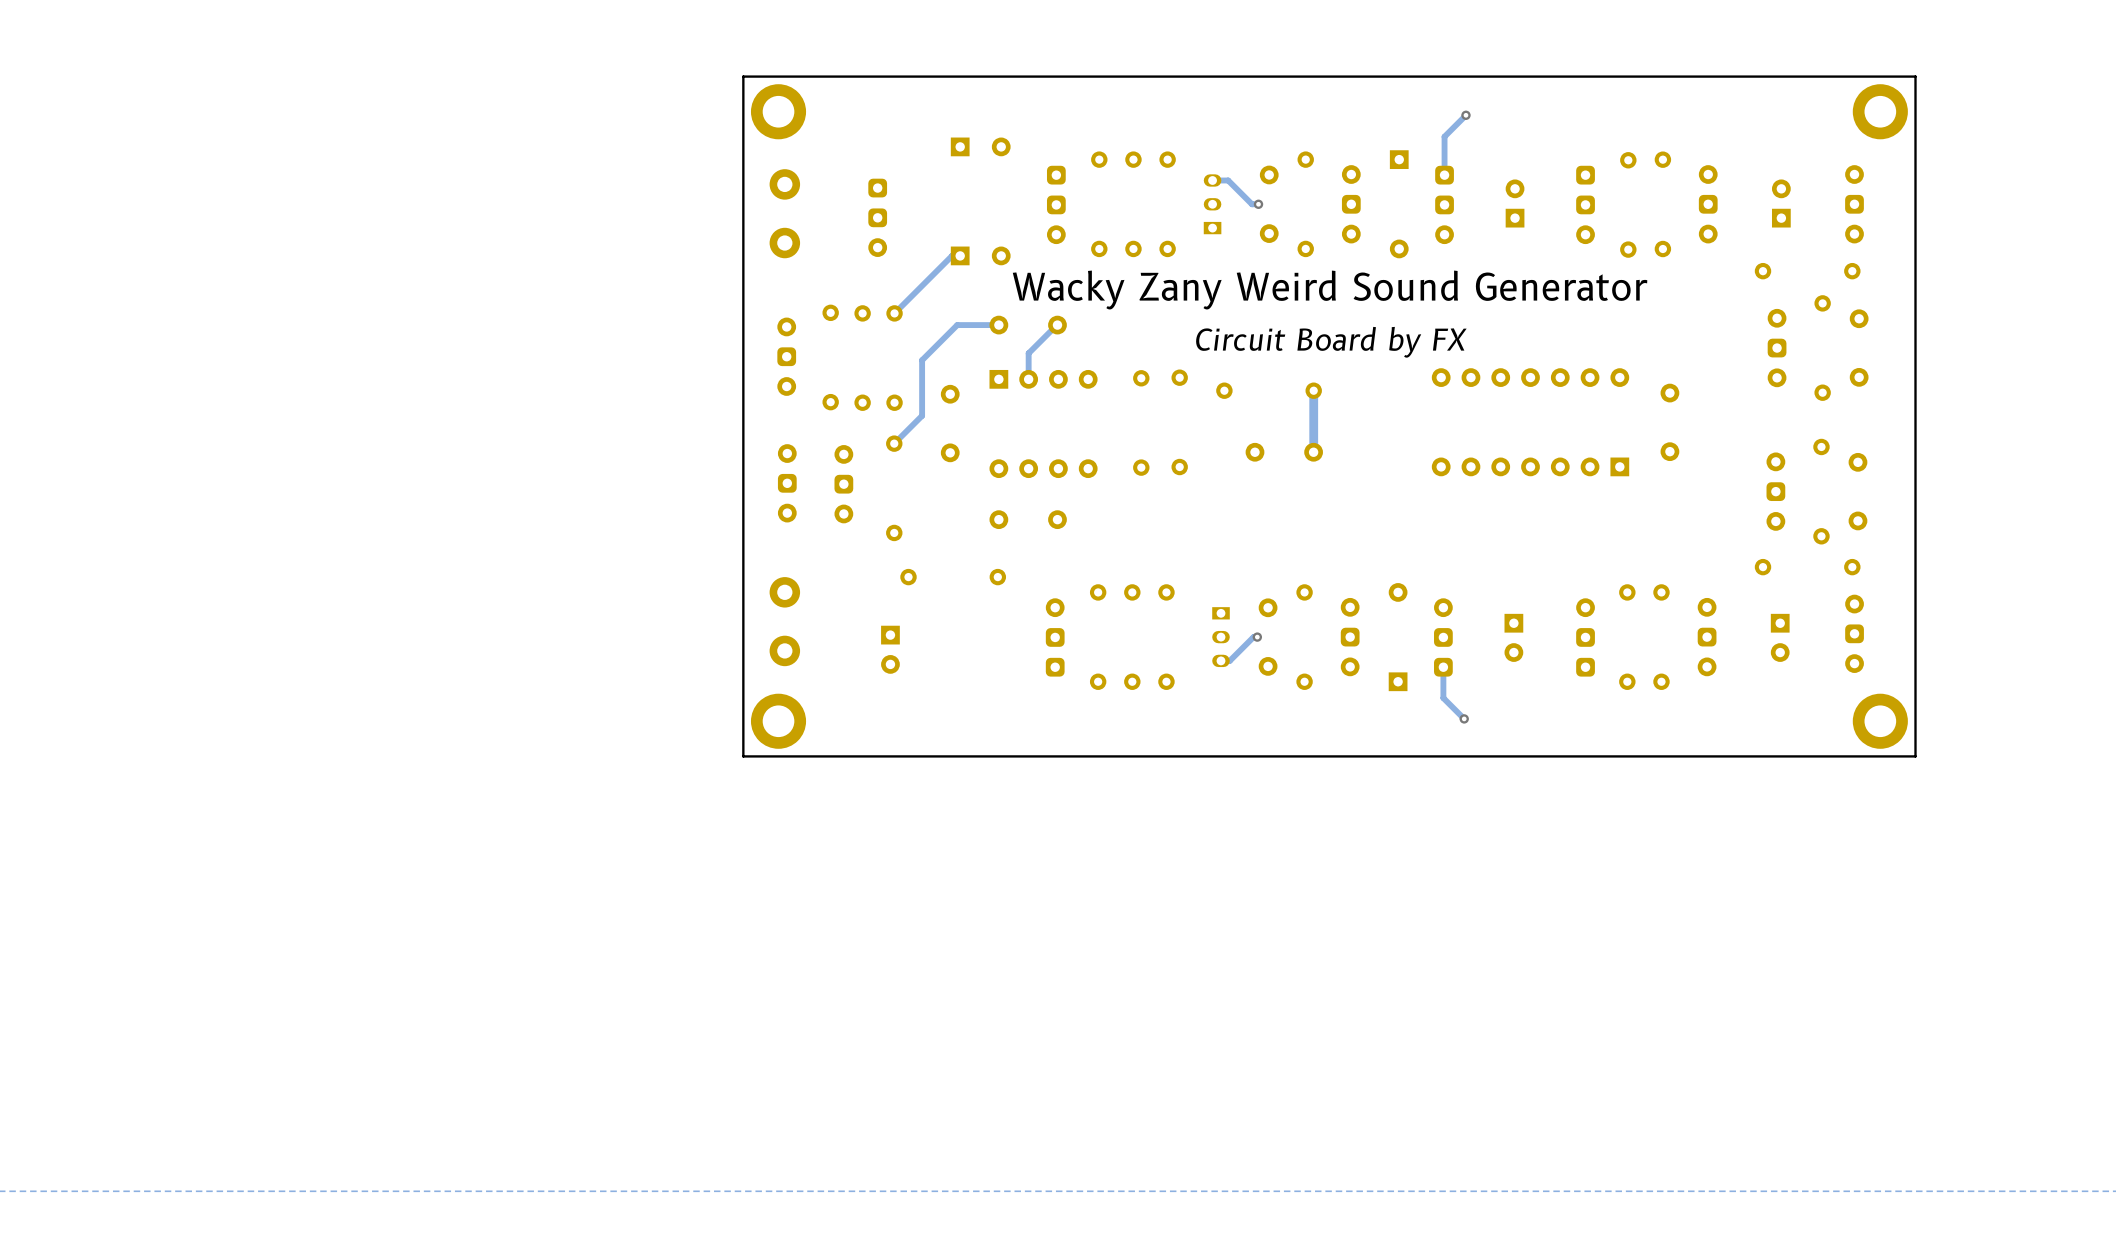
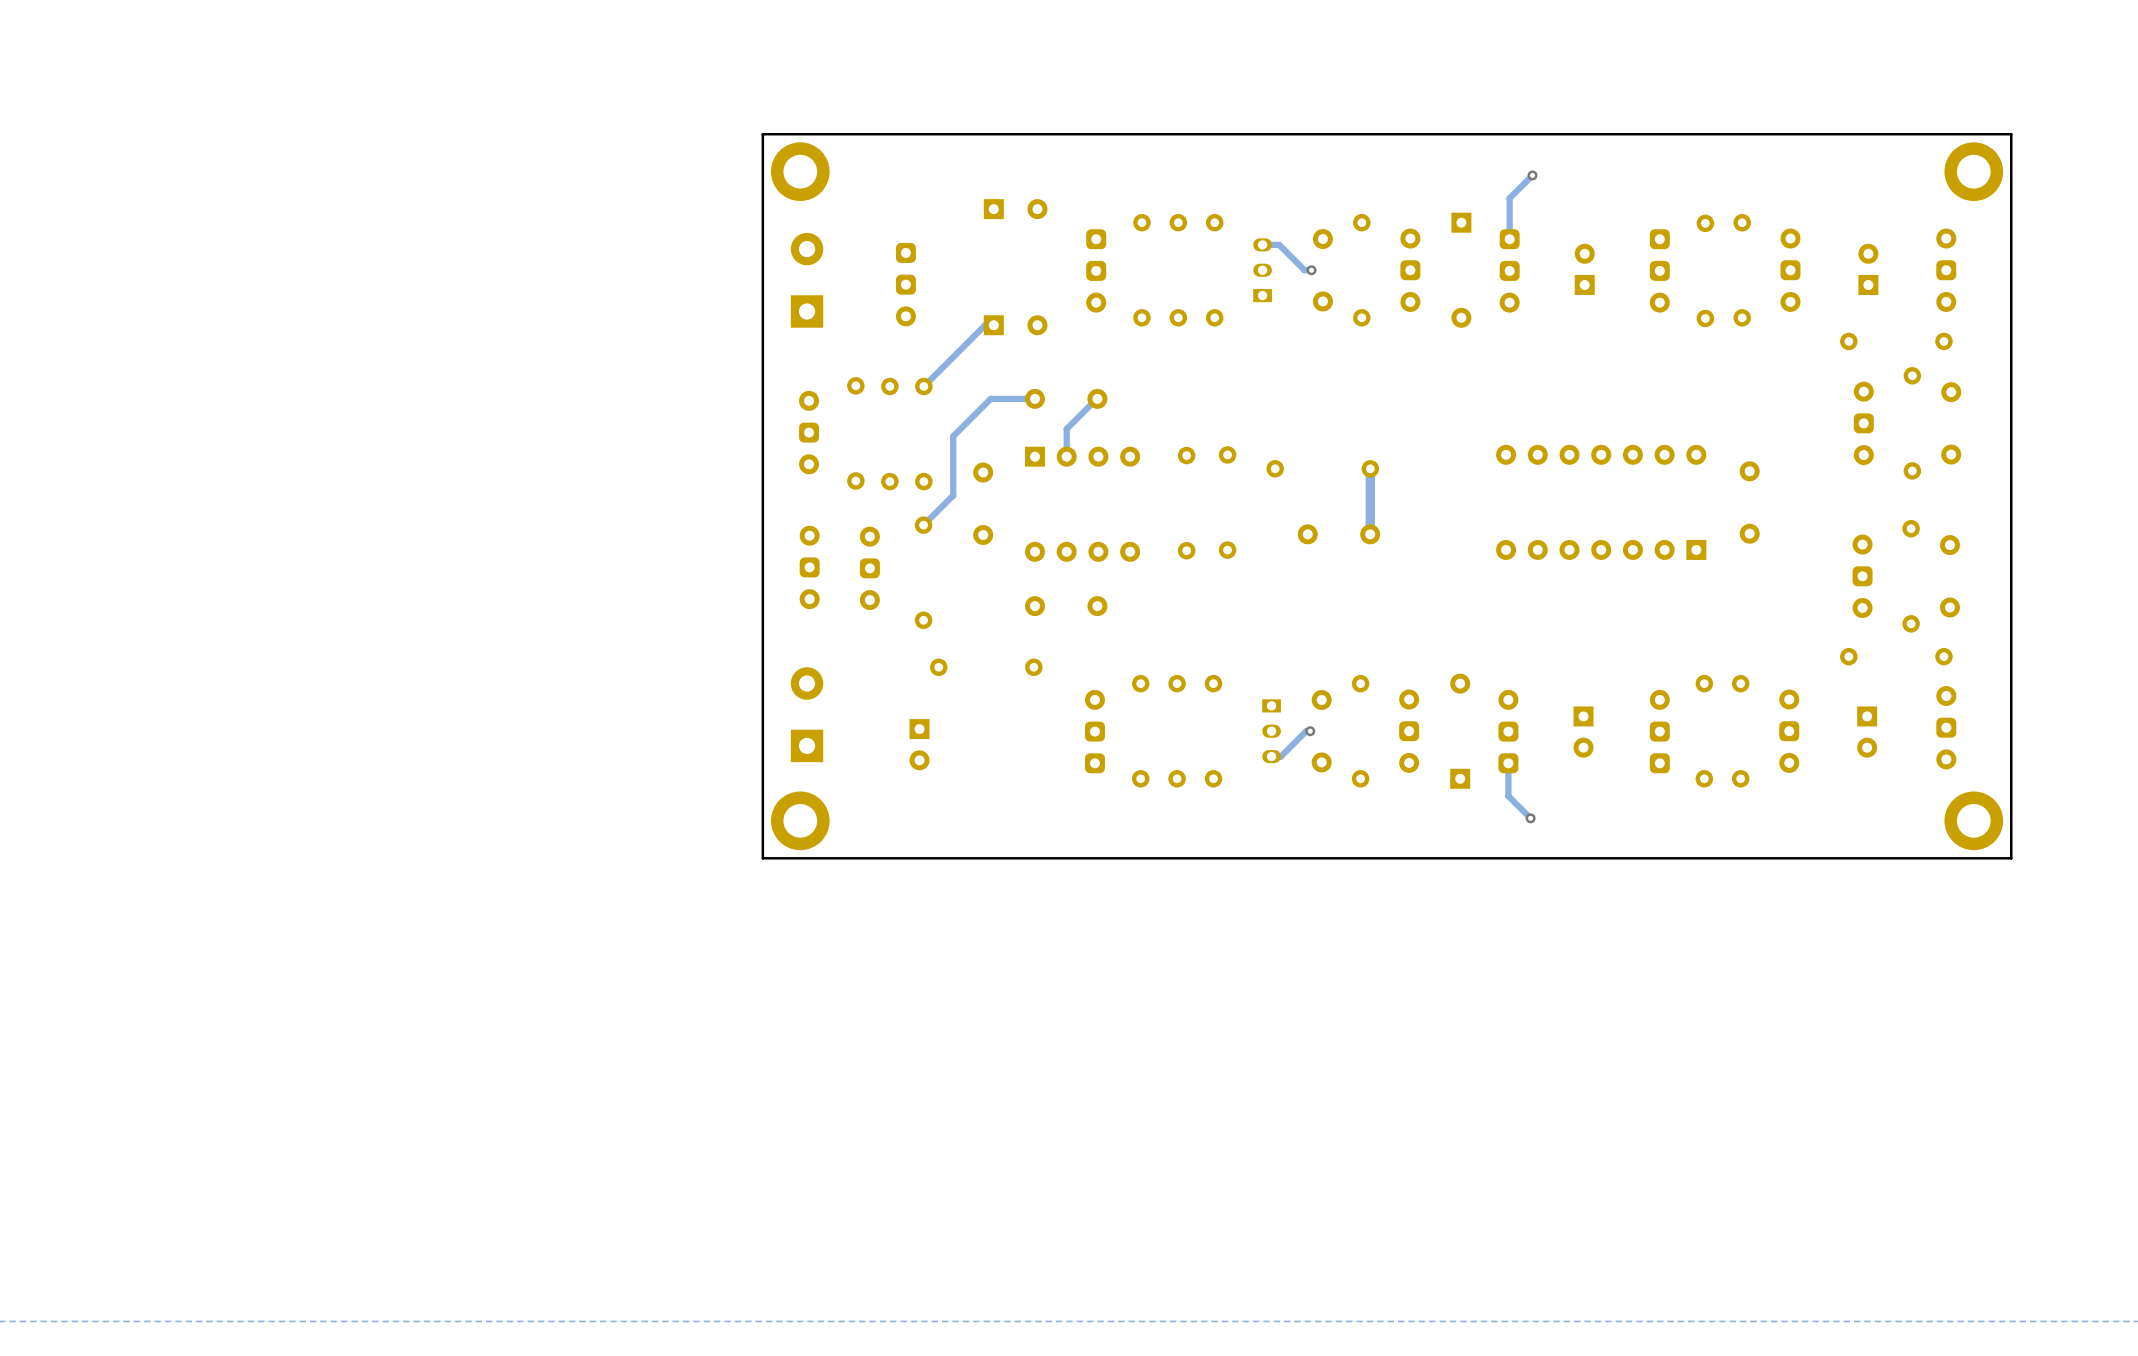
part footprint: [769, 169, 801, 259] -> [790, 232, 824, 328]
text: Wacky Zany Weird Sound Generator (1330, 290) -> none
text: Circuit Board by FX (1331, 342) -> none
part footprint: [769, 577, 801, 667] -> [790, 667, 824, 763]

